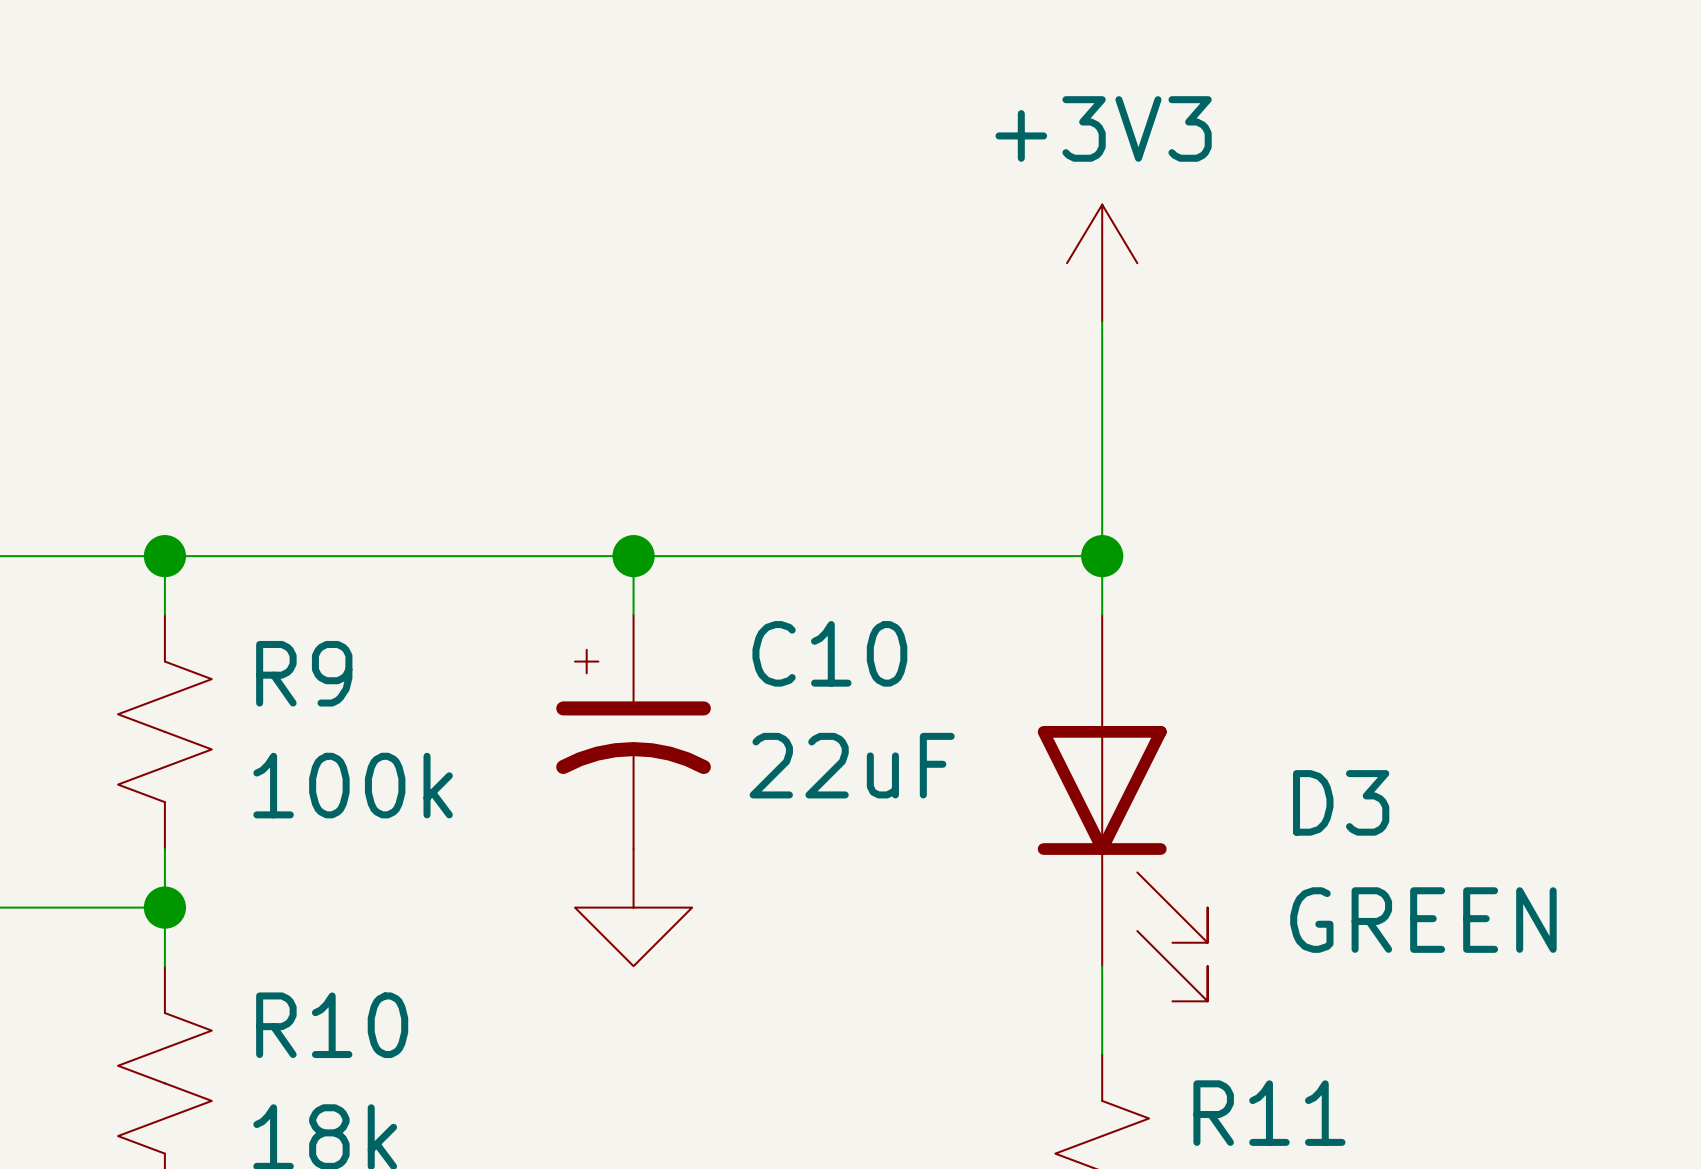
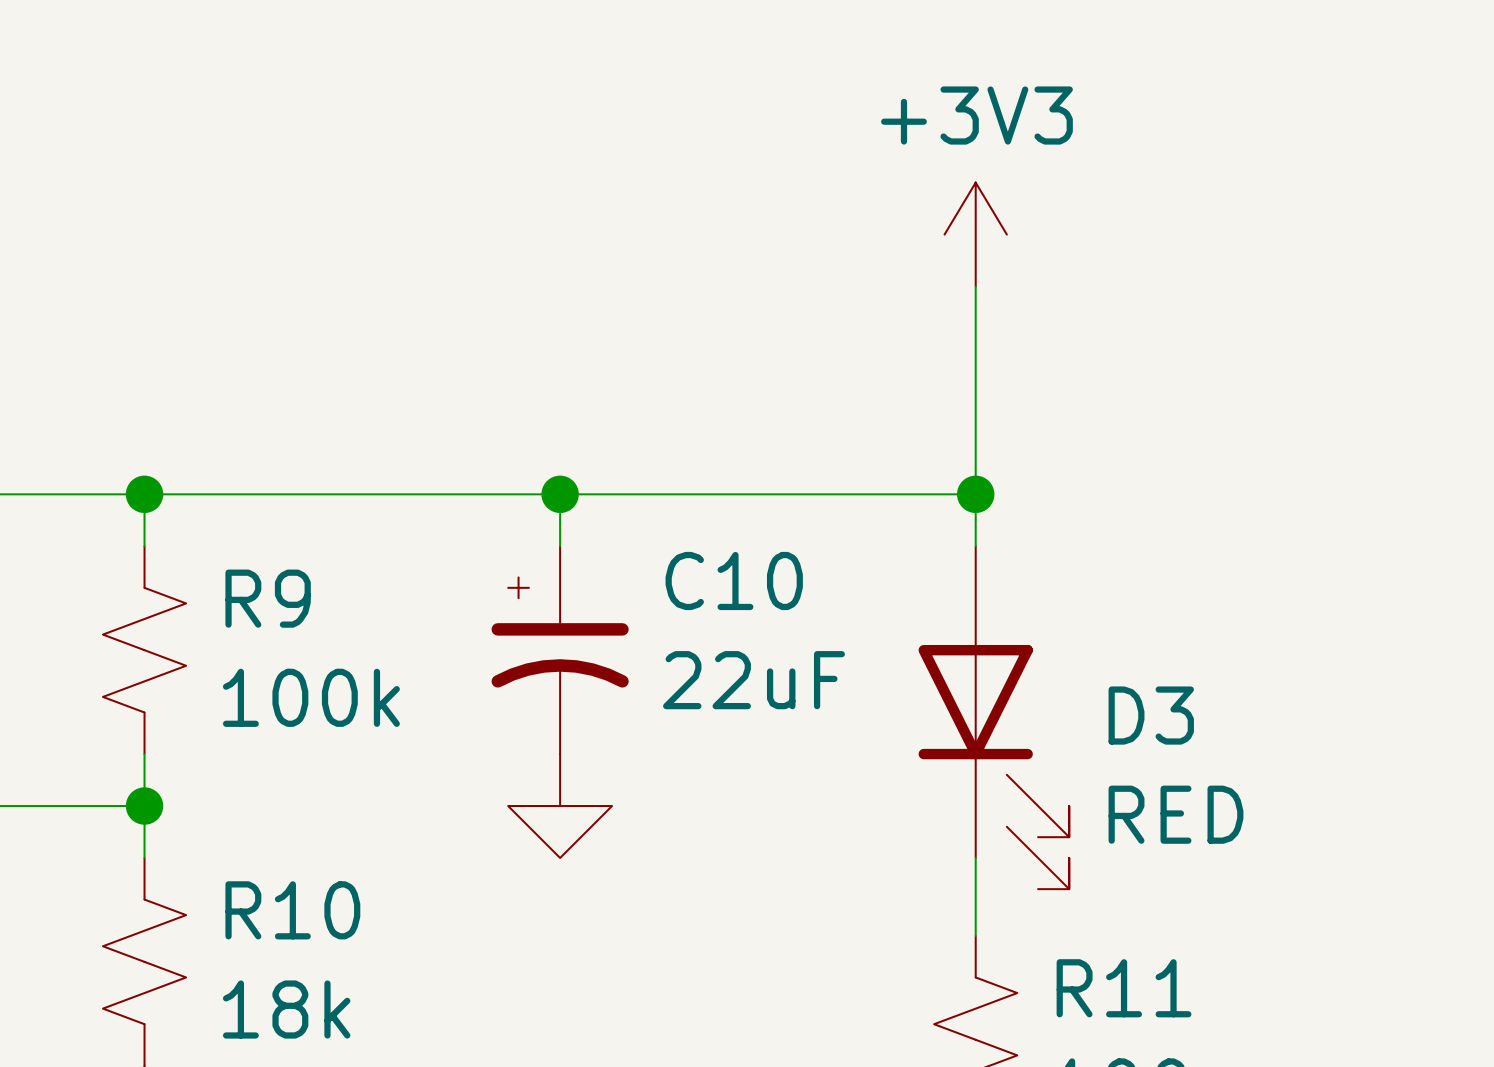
D3 name position: D3 (1341, 802) -> D3 (1151, 715)
D3 value: GREEN (1423, 920) -> RED (1175, 814)

